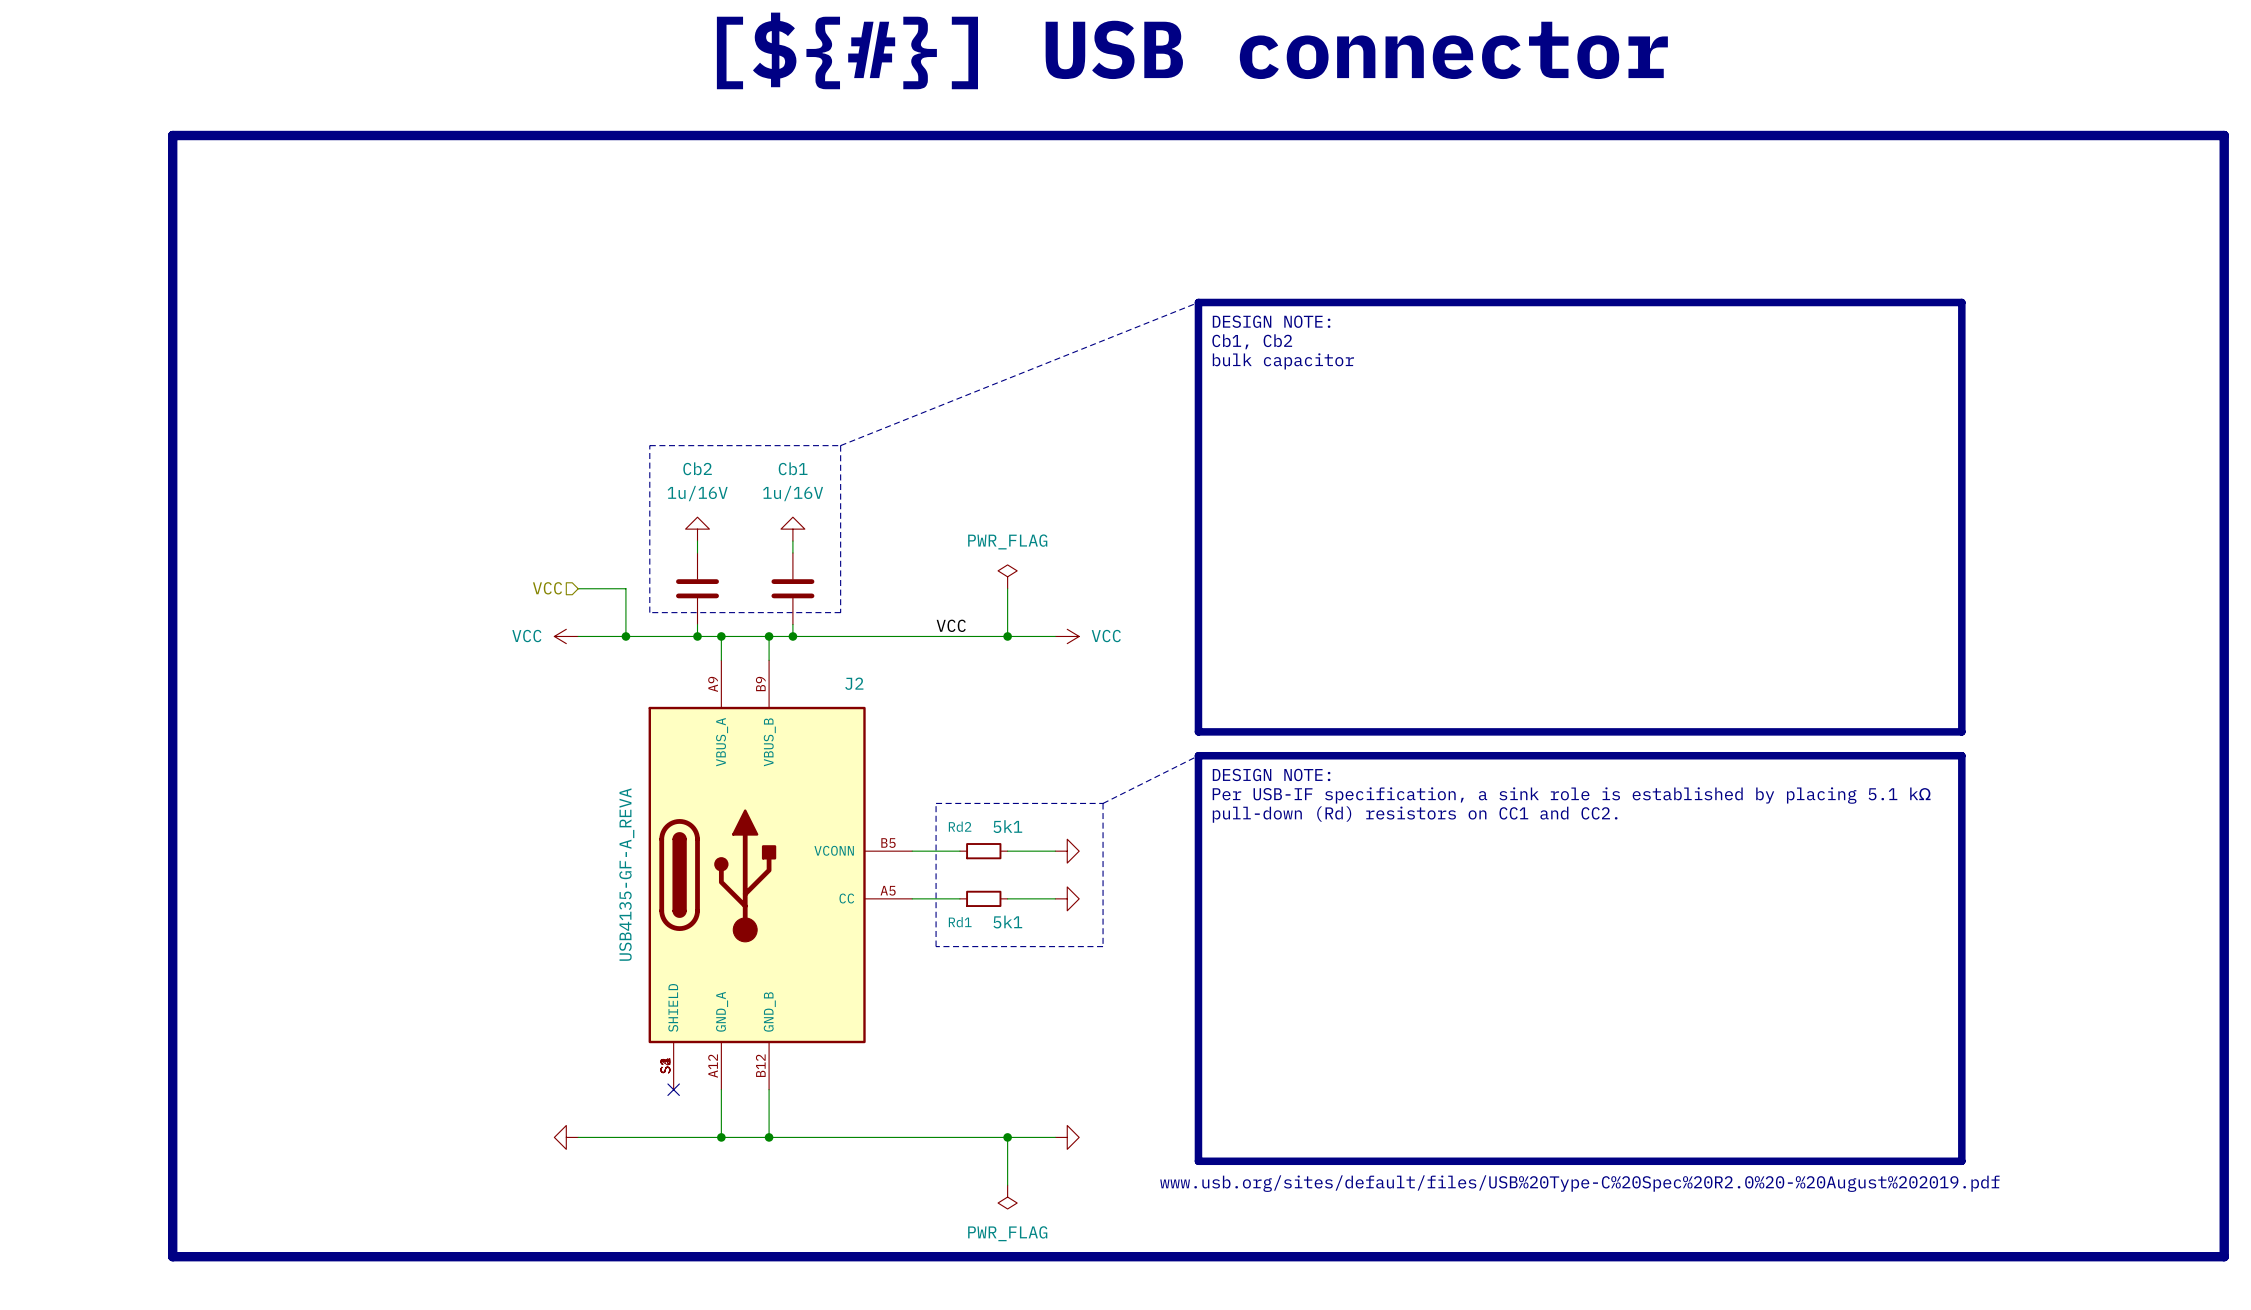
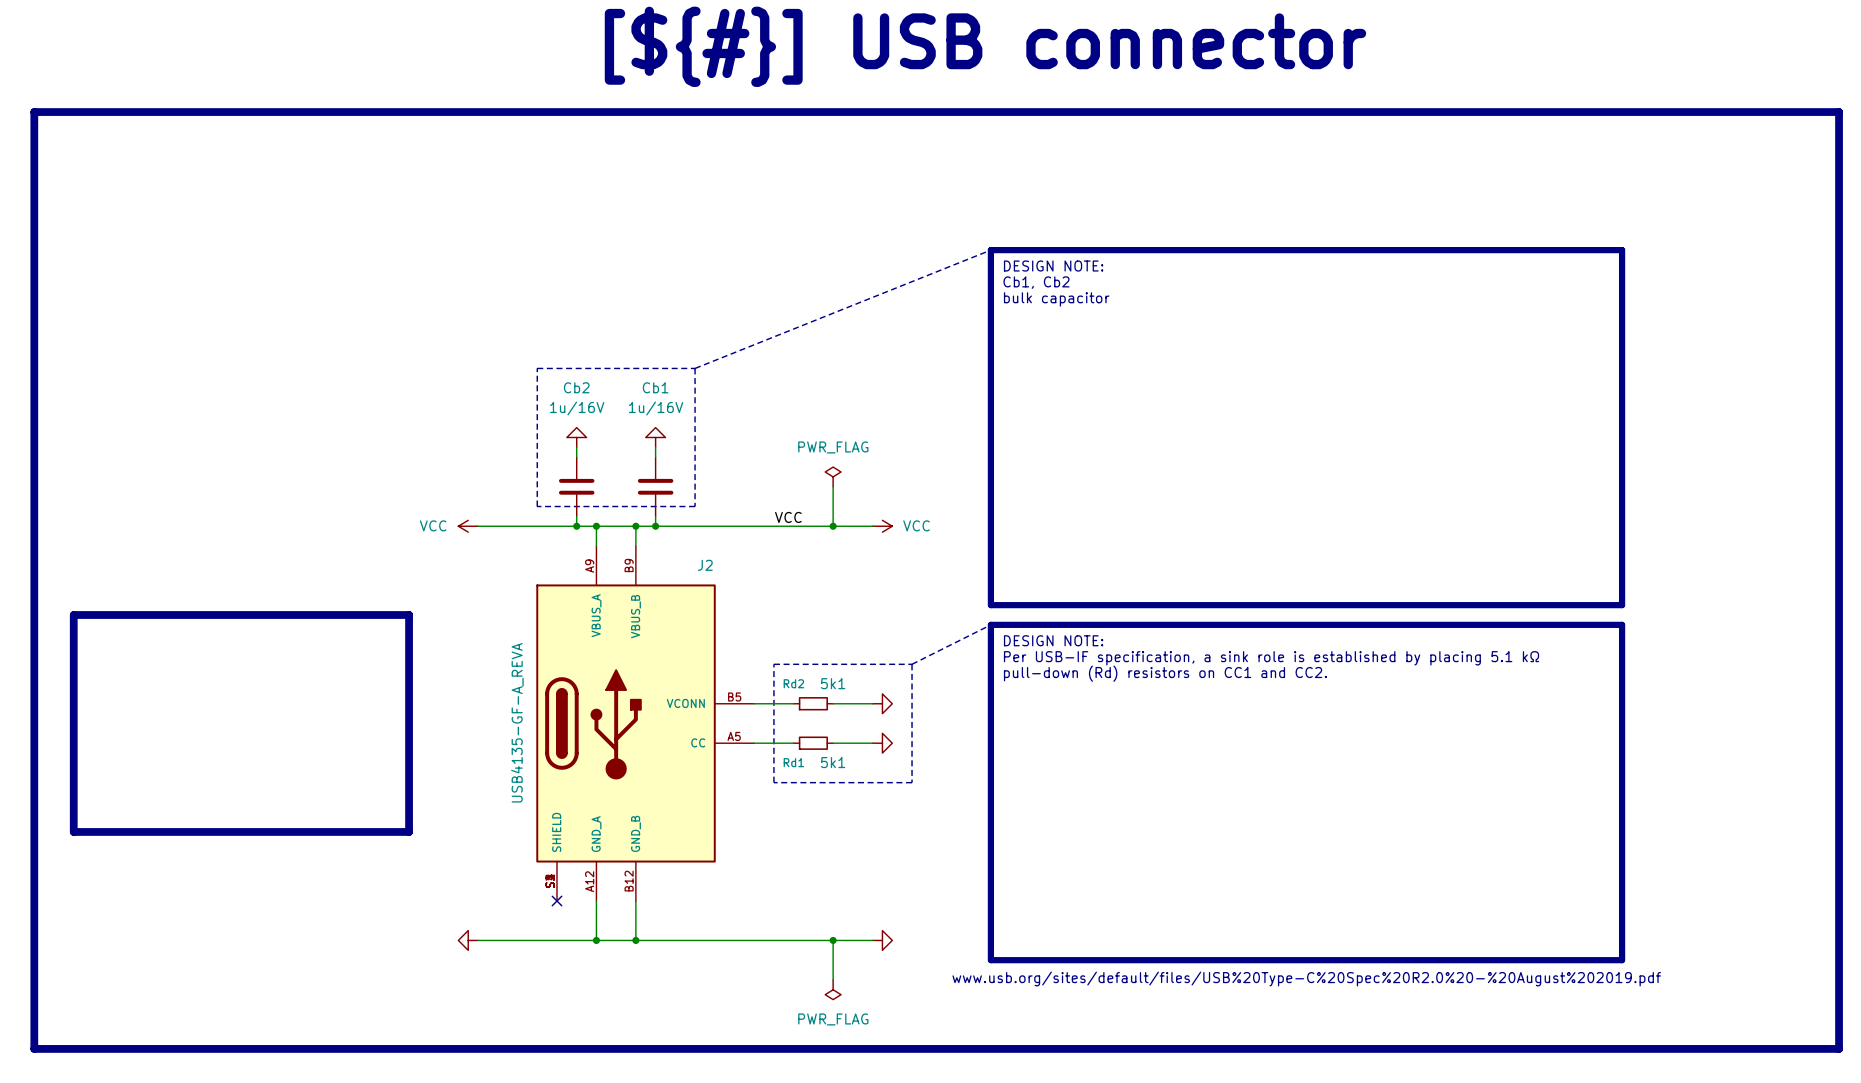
line: (172, 135) (172, 1256) (2224, 1256) -> (142, 112) (34, 112) (34, 1048) (1839, 1048) (1839, 1039)
hierarchical label: VCC (547, 588) -> none
wire: (578, 588) (625, 588) (625, 636) -> none
junction: (625, 636) -> none
line: none -> (73, 615) (409, 615) (409, 831) (73, 831) (73, 615)

